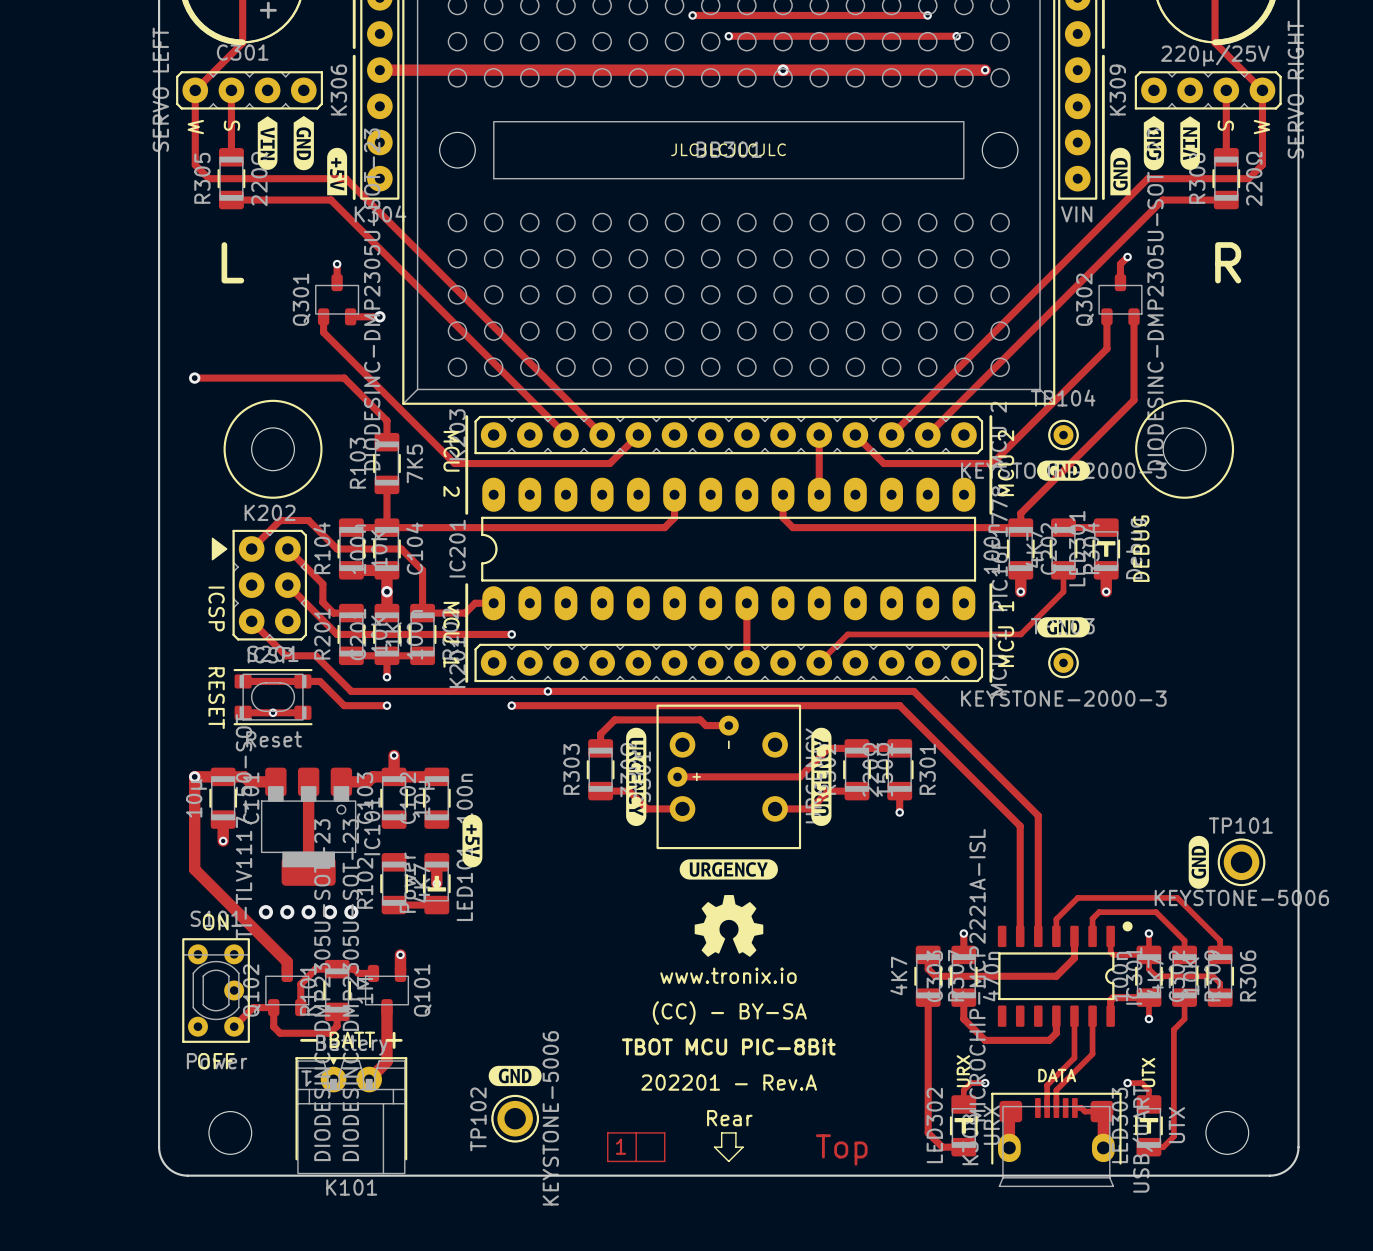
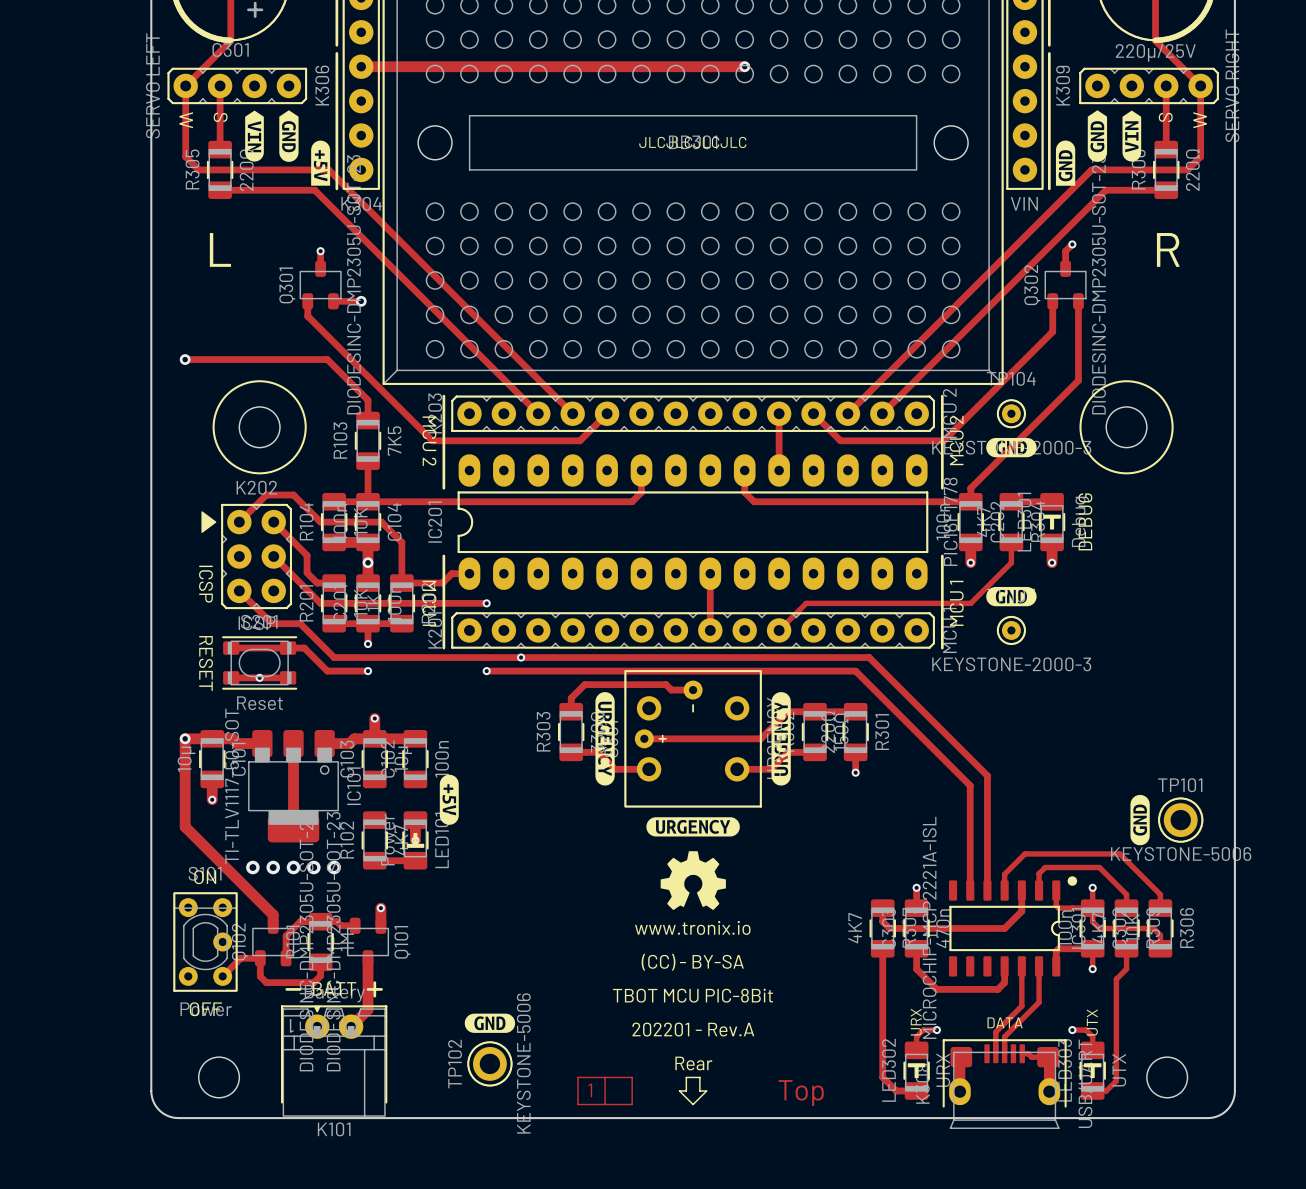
track: (692, 15) (927, 15) -> none
via: (692, 15) -> none
via: (927, 15) -> none
track: (728, 36) (956, 36) -> none
via: (728, 36) -> none
via: (956, 36) -> none
track: (783, 70) (985, 70) -> none
via: (985, 70) -> none

